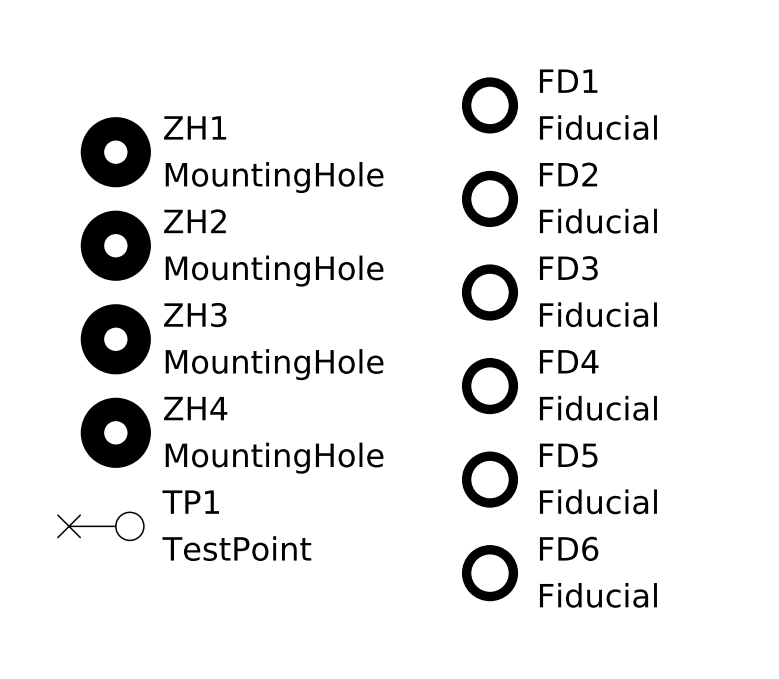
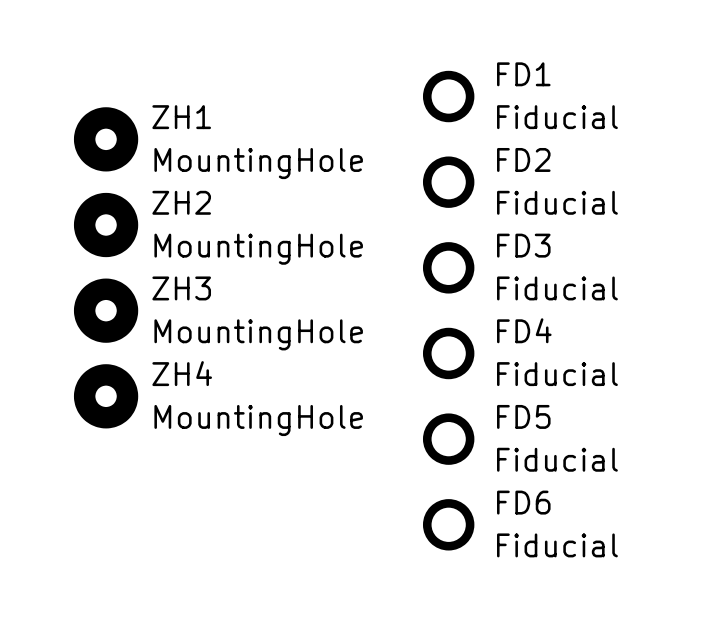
no-connect mark: (69, 526) -> none
TP1: TestPoint (106, 526) -> none

